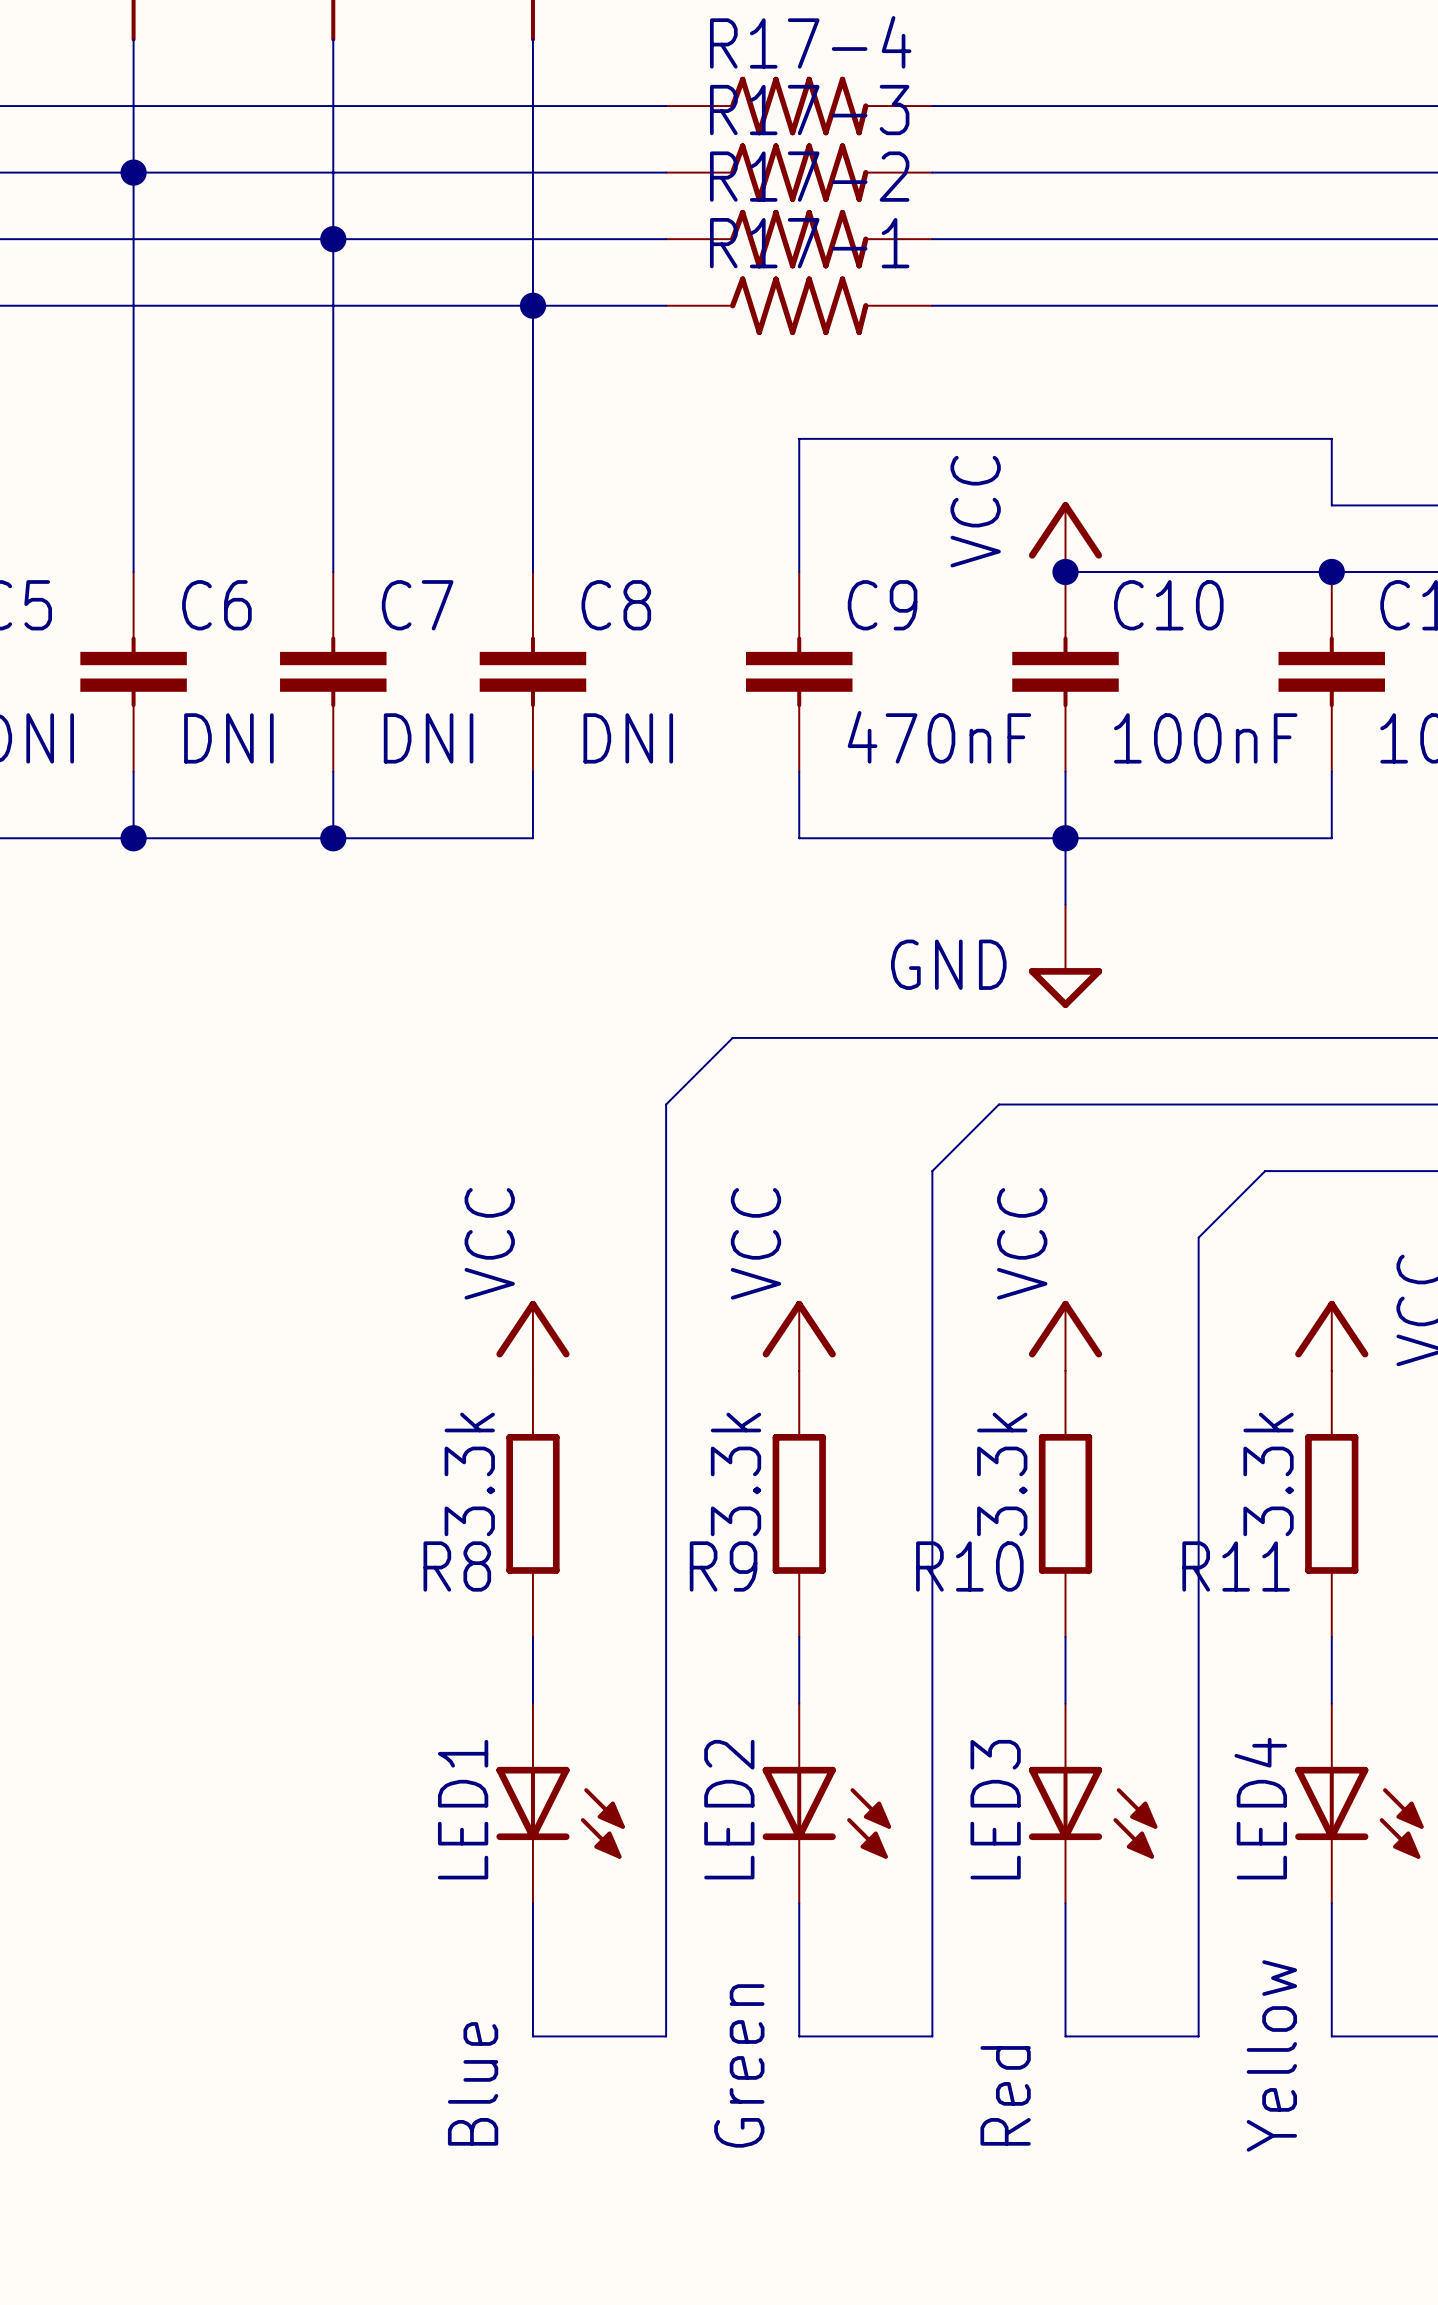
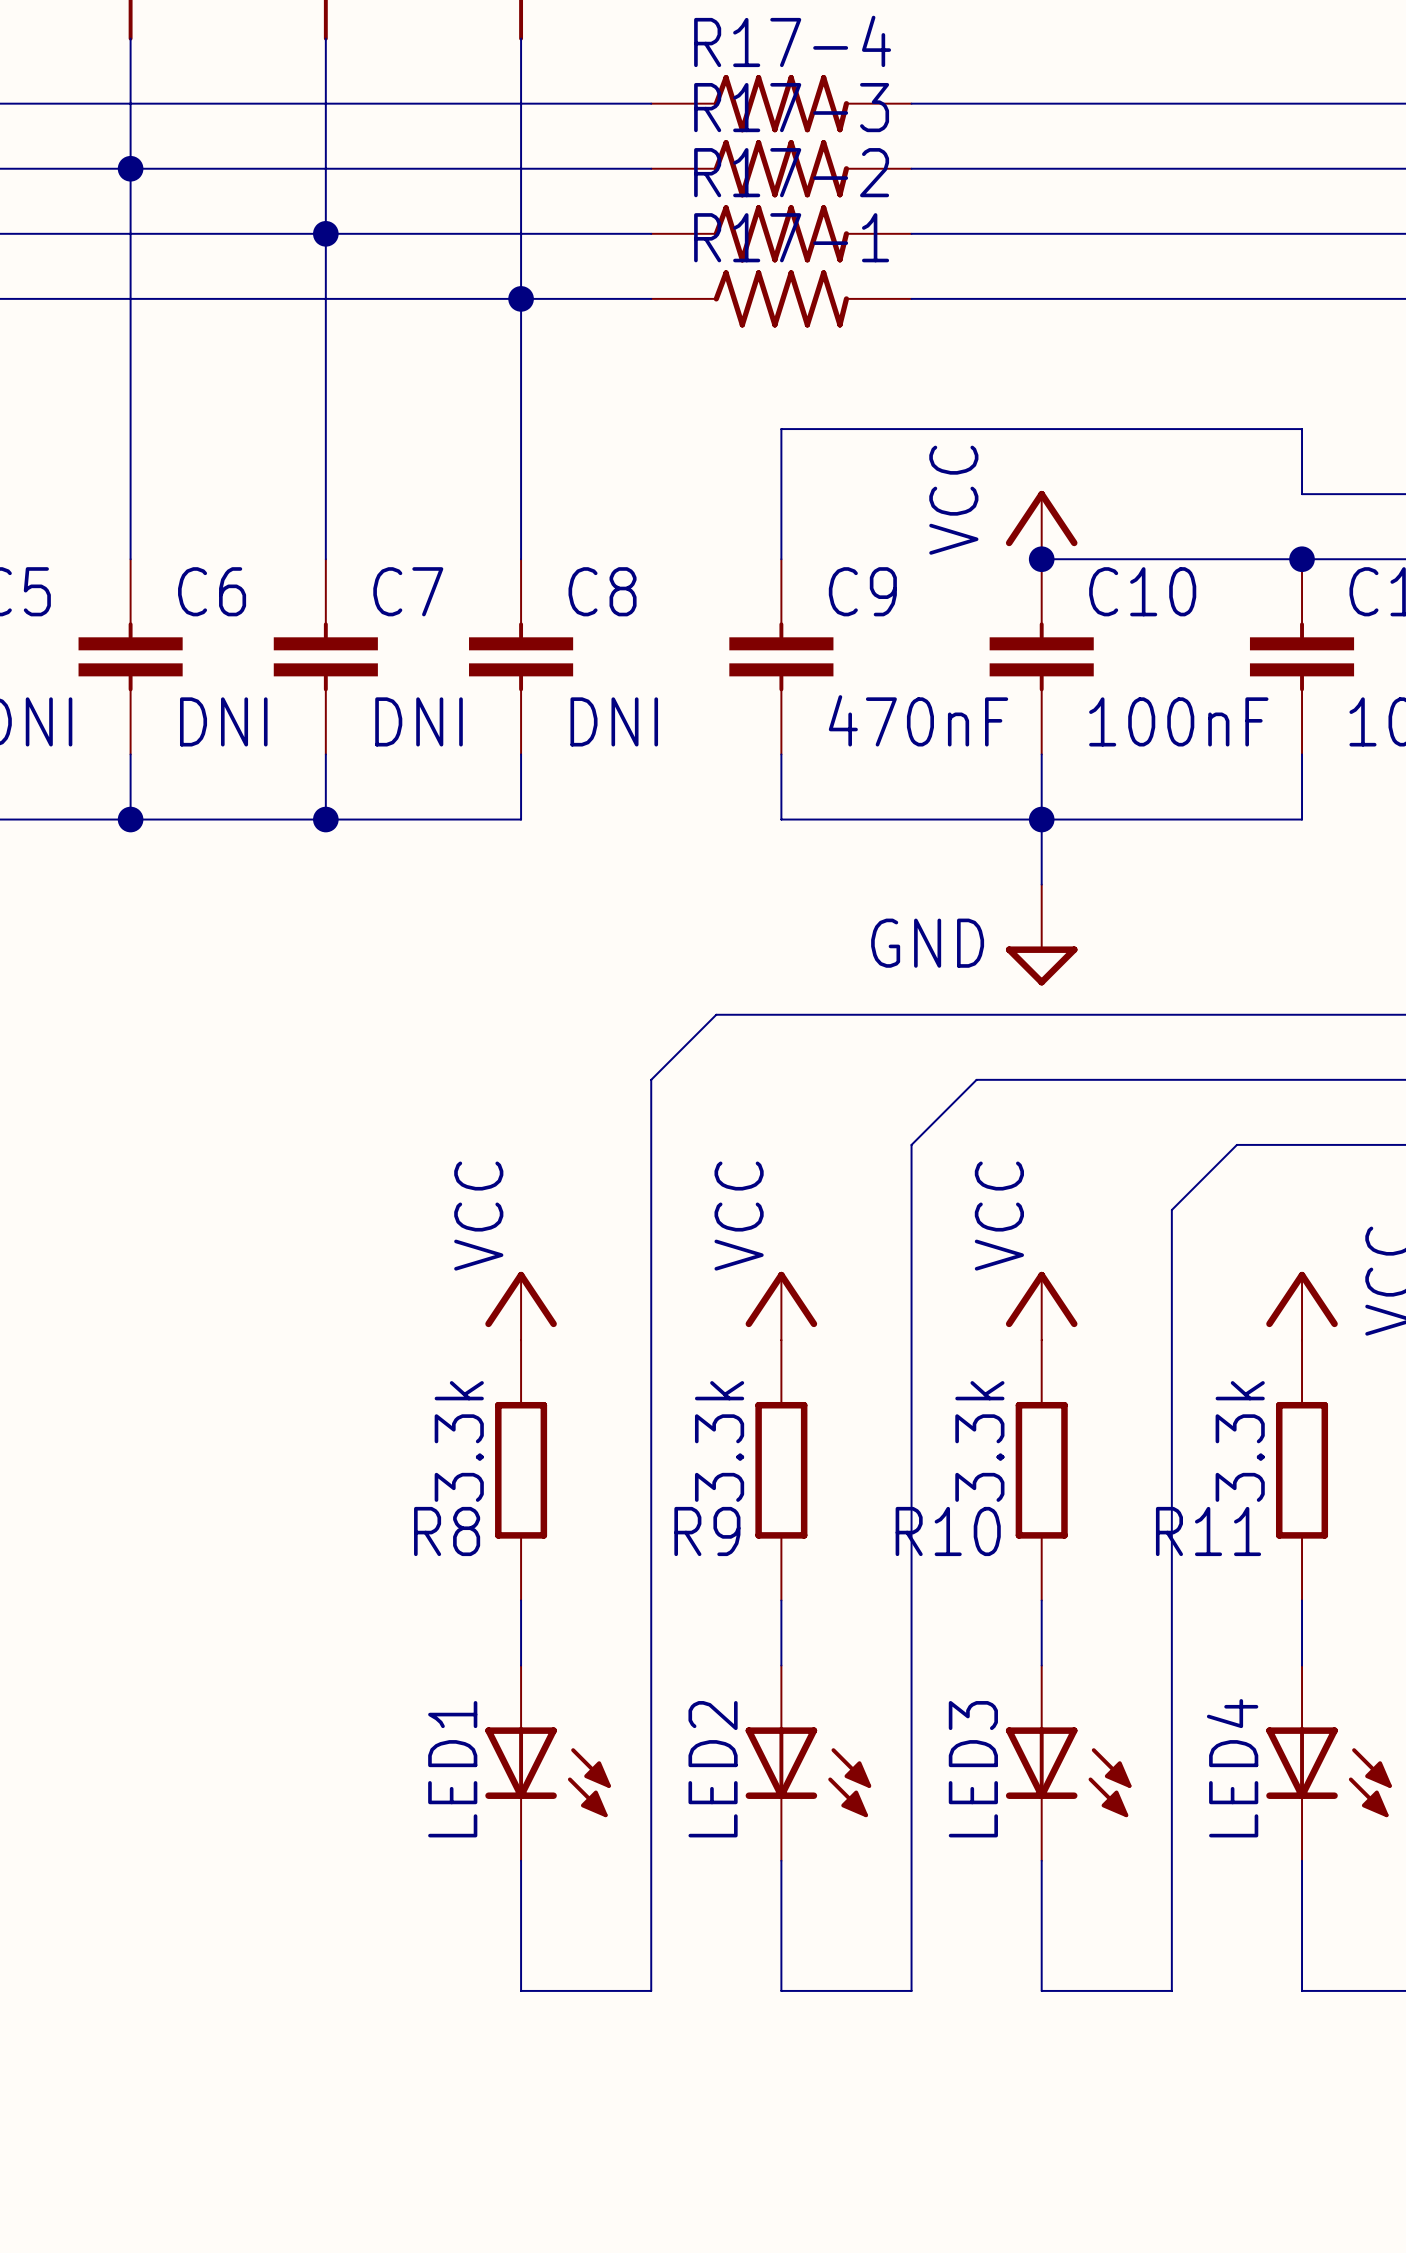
LED4 value: Yellow (1271, 2055) -> none
LED2 value: Green (739, 2065) -> none
LED1 value: Blue (473, 2083) -> none
LED3 value: Red (1005, 2095) -> none

